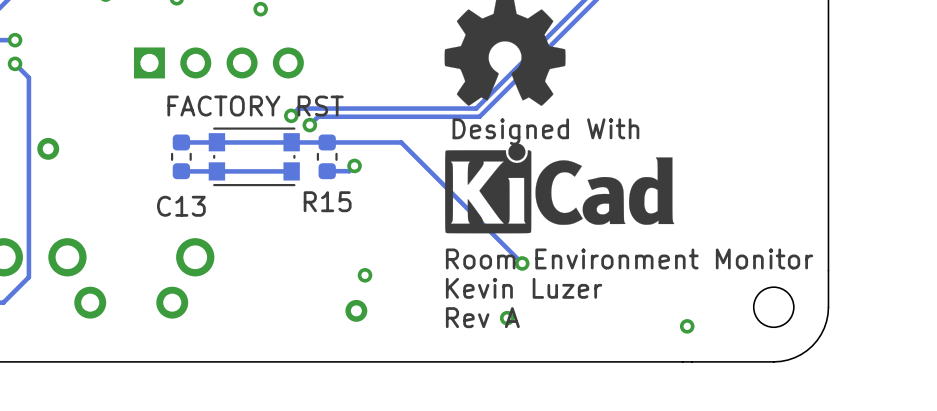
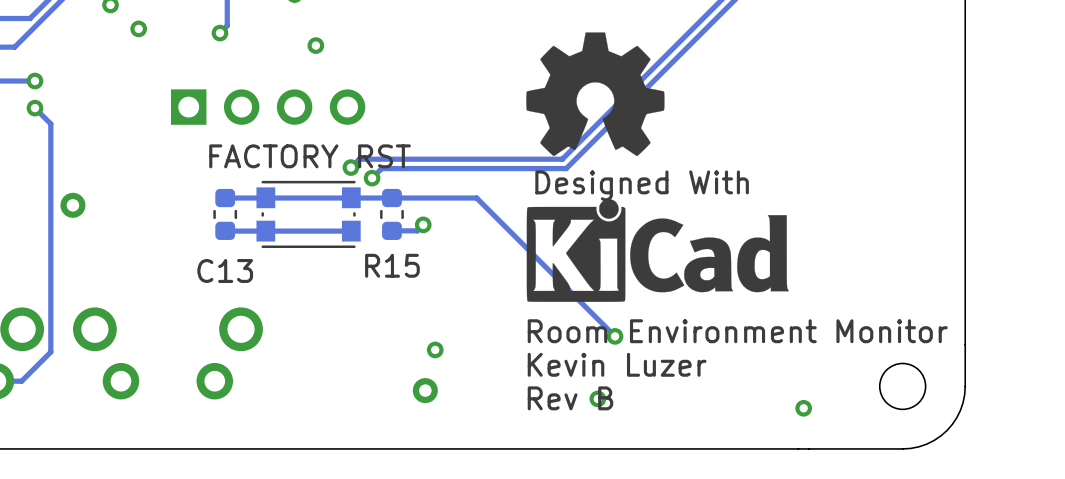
text: Rev A (482, 317) -> Rev B (570, 398)

